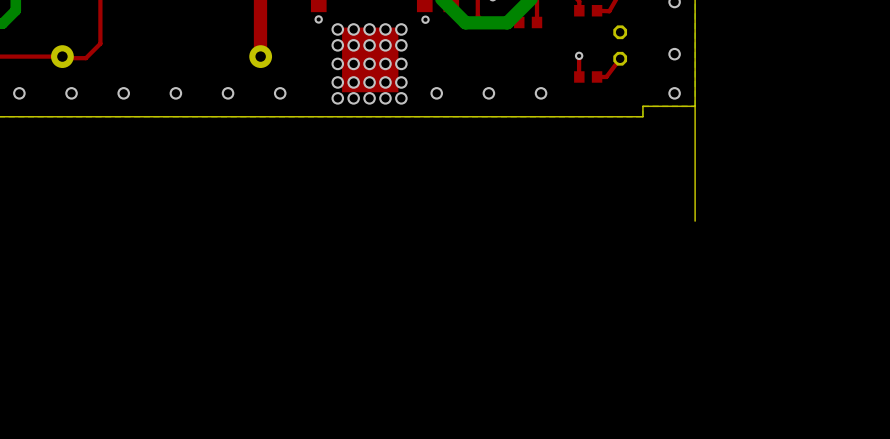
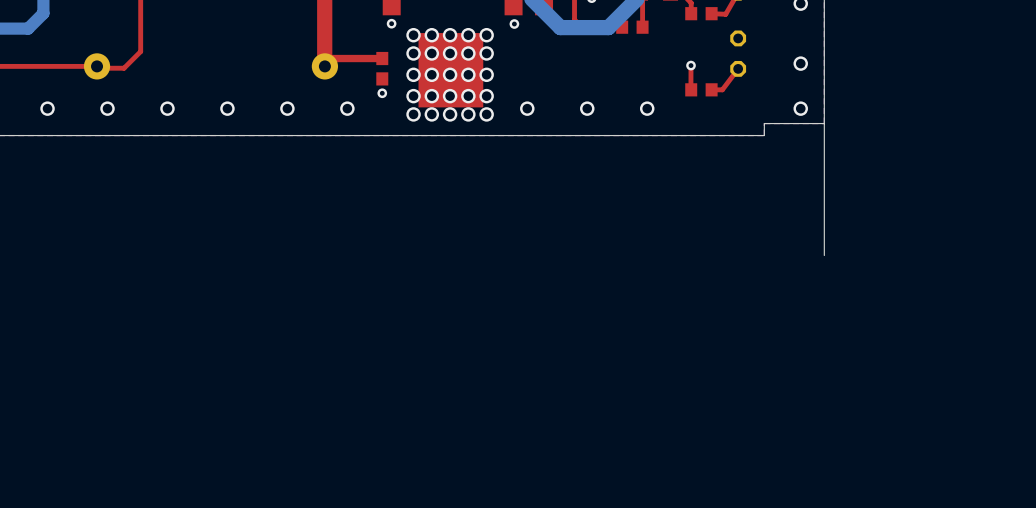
top track: none -> (382, 58) (332, 58) (324, 66)
part: none -> (382, 68)
via: none -> (382, 93)

